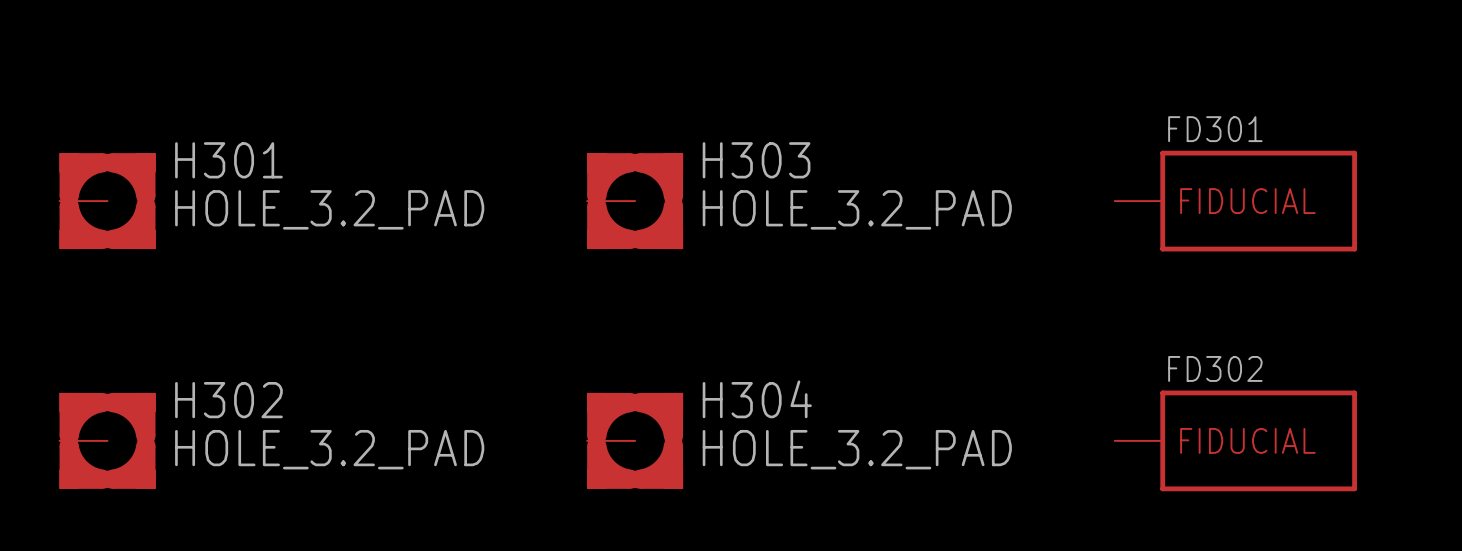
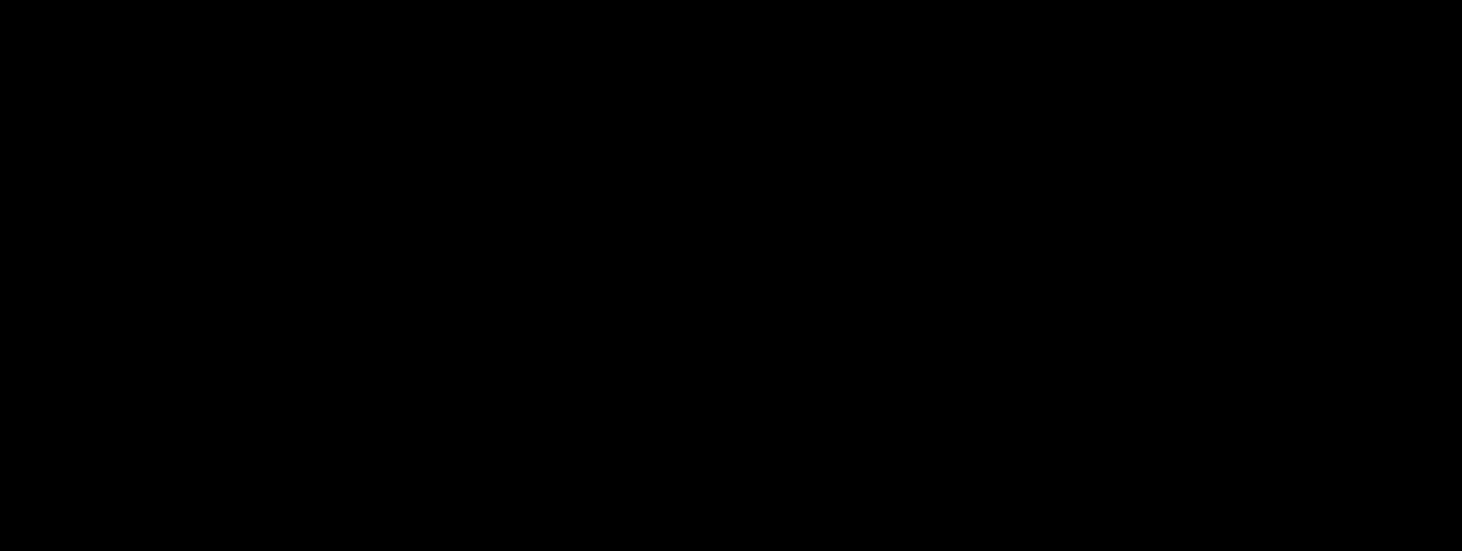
H301: HOLE_3.2_PAD (107, 201) -> none
H303: HOLE_3.2_PAD (635, 201) -> none
FD301: (1235, 201) -> none
H302: HOLE_3.2_PAD (107, 440) -> none
H304: HOLE_3.2_PAD (635, 440) -> none
FD302: (1235, 440) -> none

